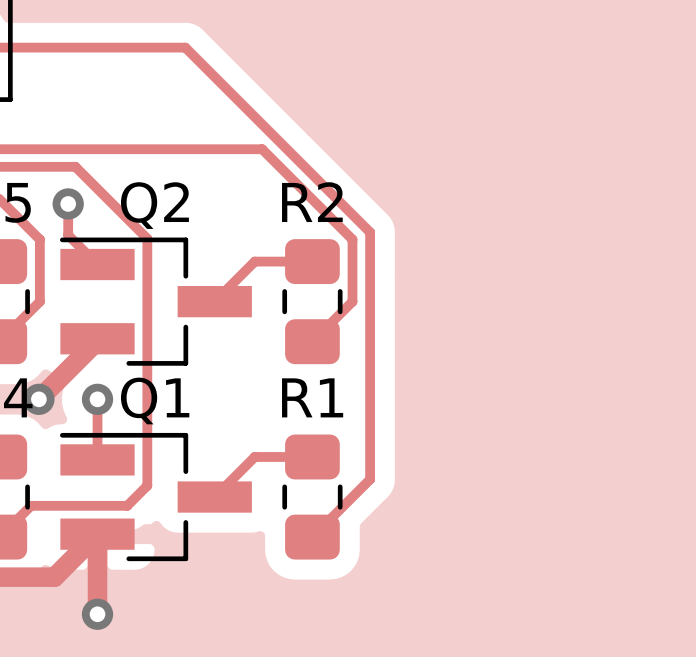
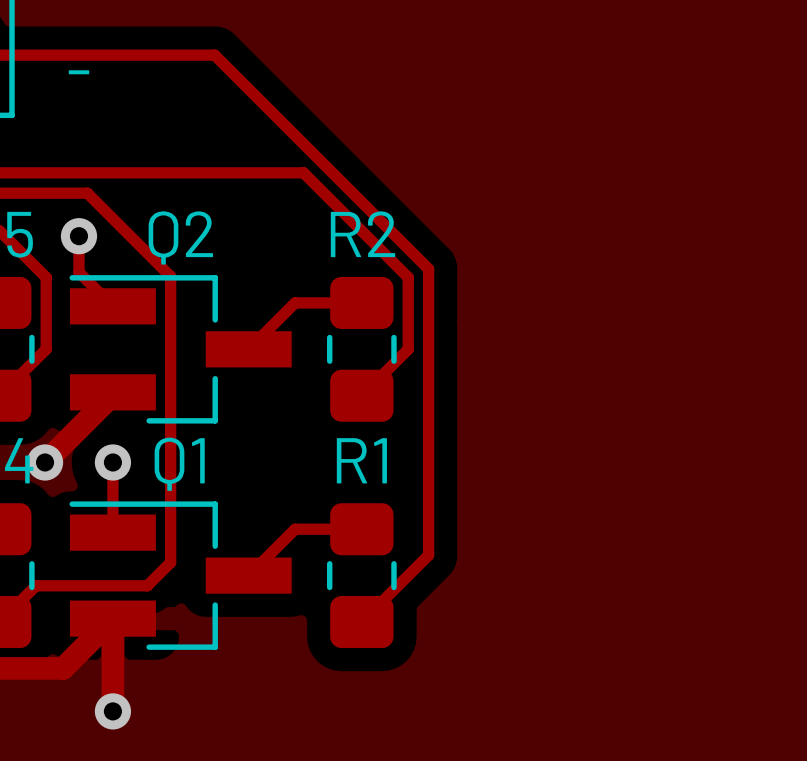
text: none -> - (78, 72)

